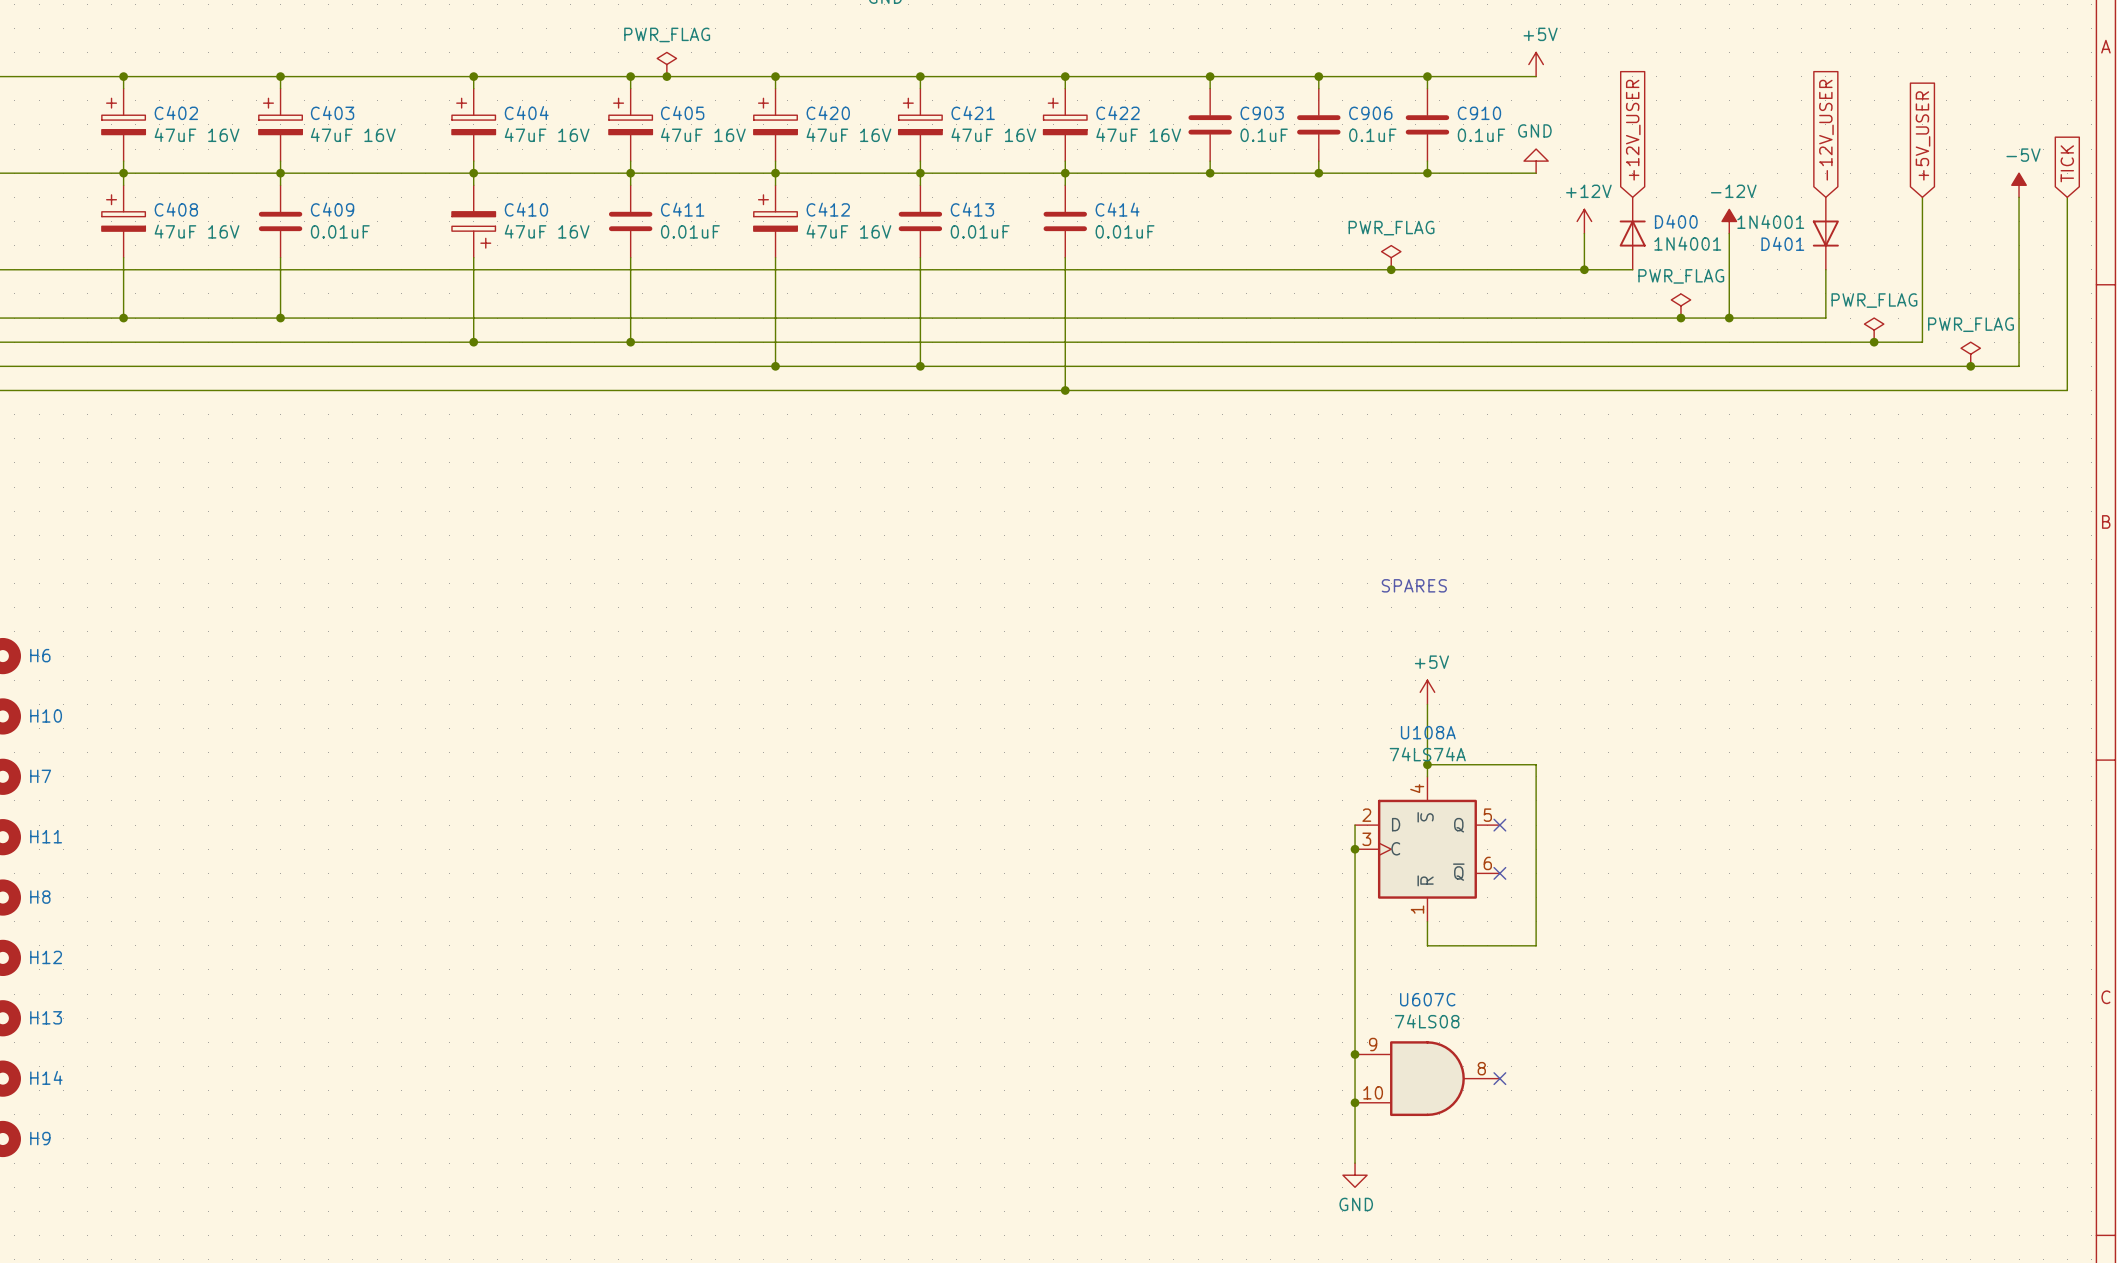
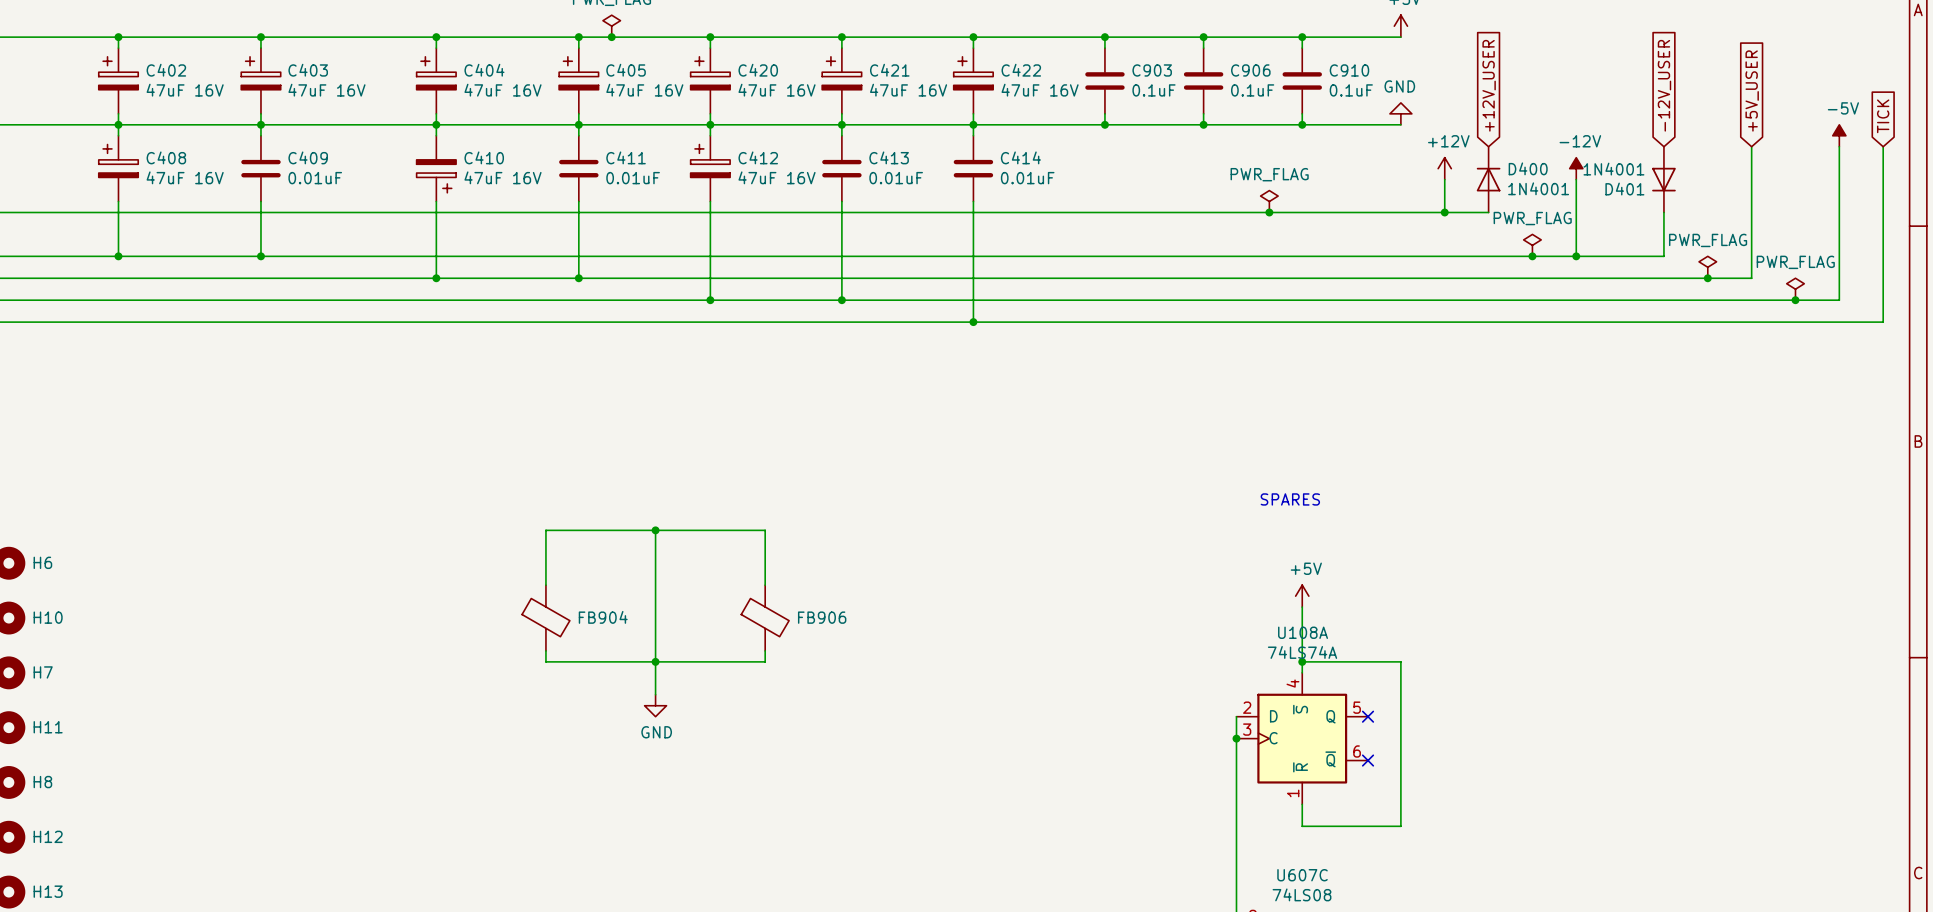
wire: none -> (655, 530) (655, 694)
junction: none -> (655, 530)
wire: none -> (545, 585) (545, 530) (765, 530) (765, 585)
FB904: none -> (545, 618)
FB906: none -> (765, 618)
wire: none -> (545, 650) (545, 661) (765, 661) (765, 650)
junction: none -> (655, 661)
power symbol: none -> GND (655, 705)

